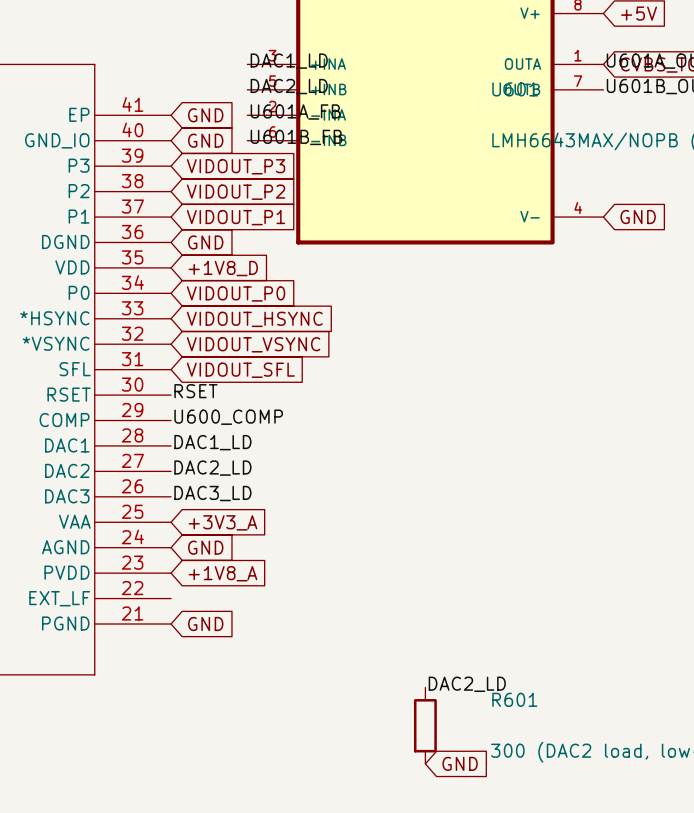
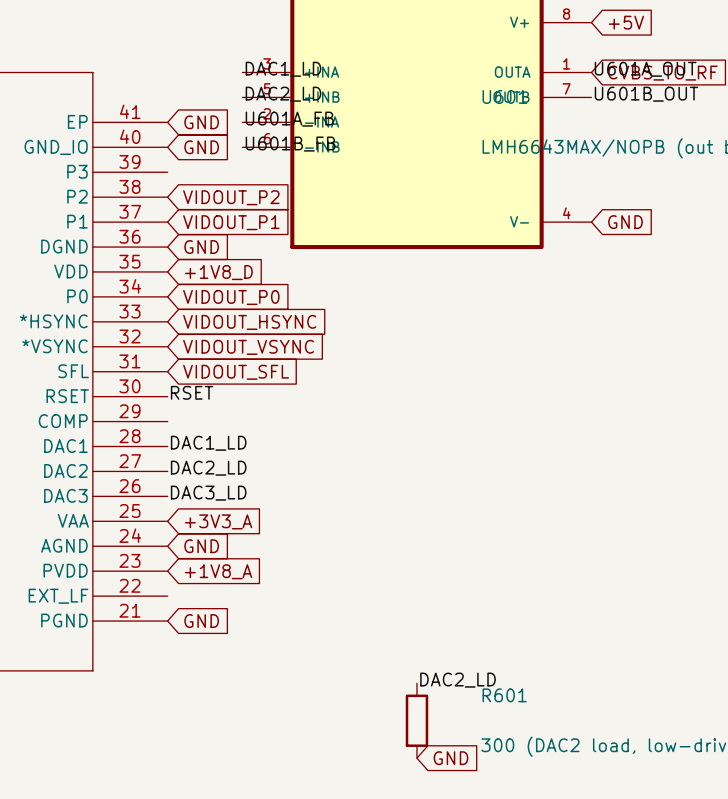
global label: VIDOUT_P3 (236, 166) -> none
label: U600_COMP (228, 417) -> none

